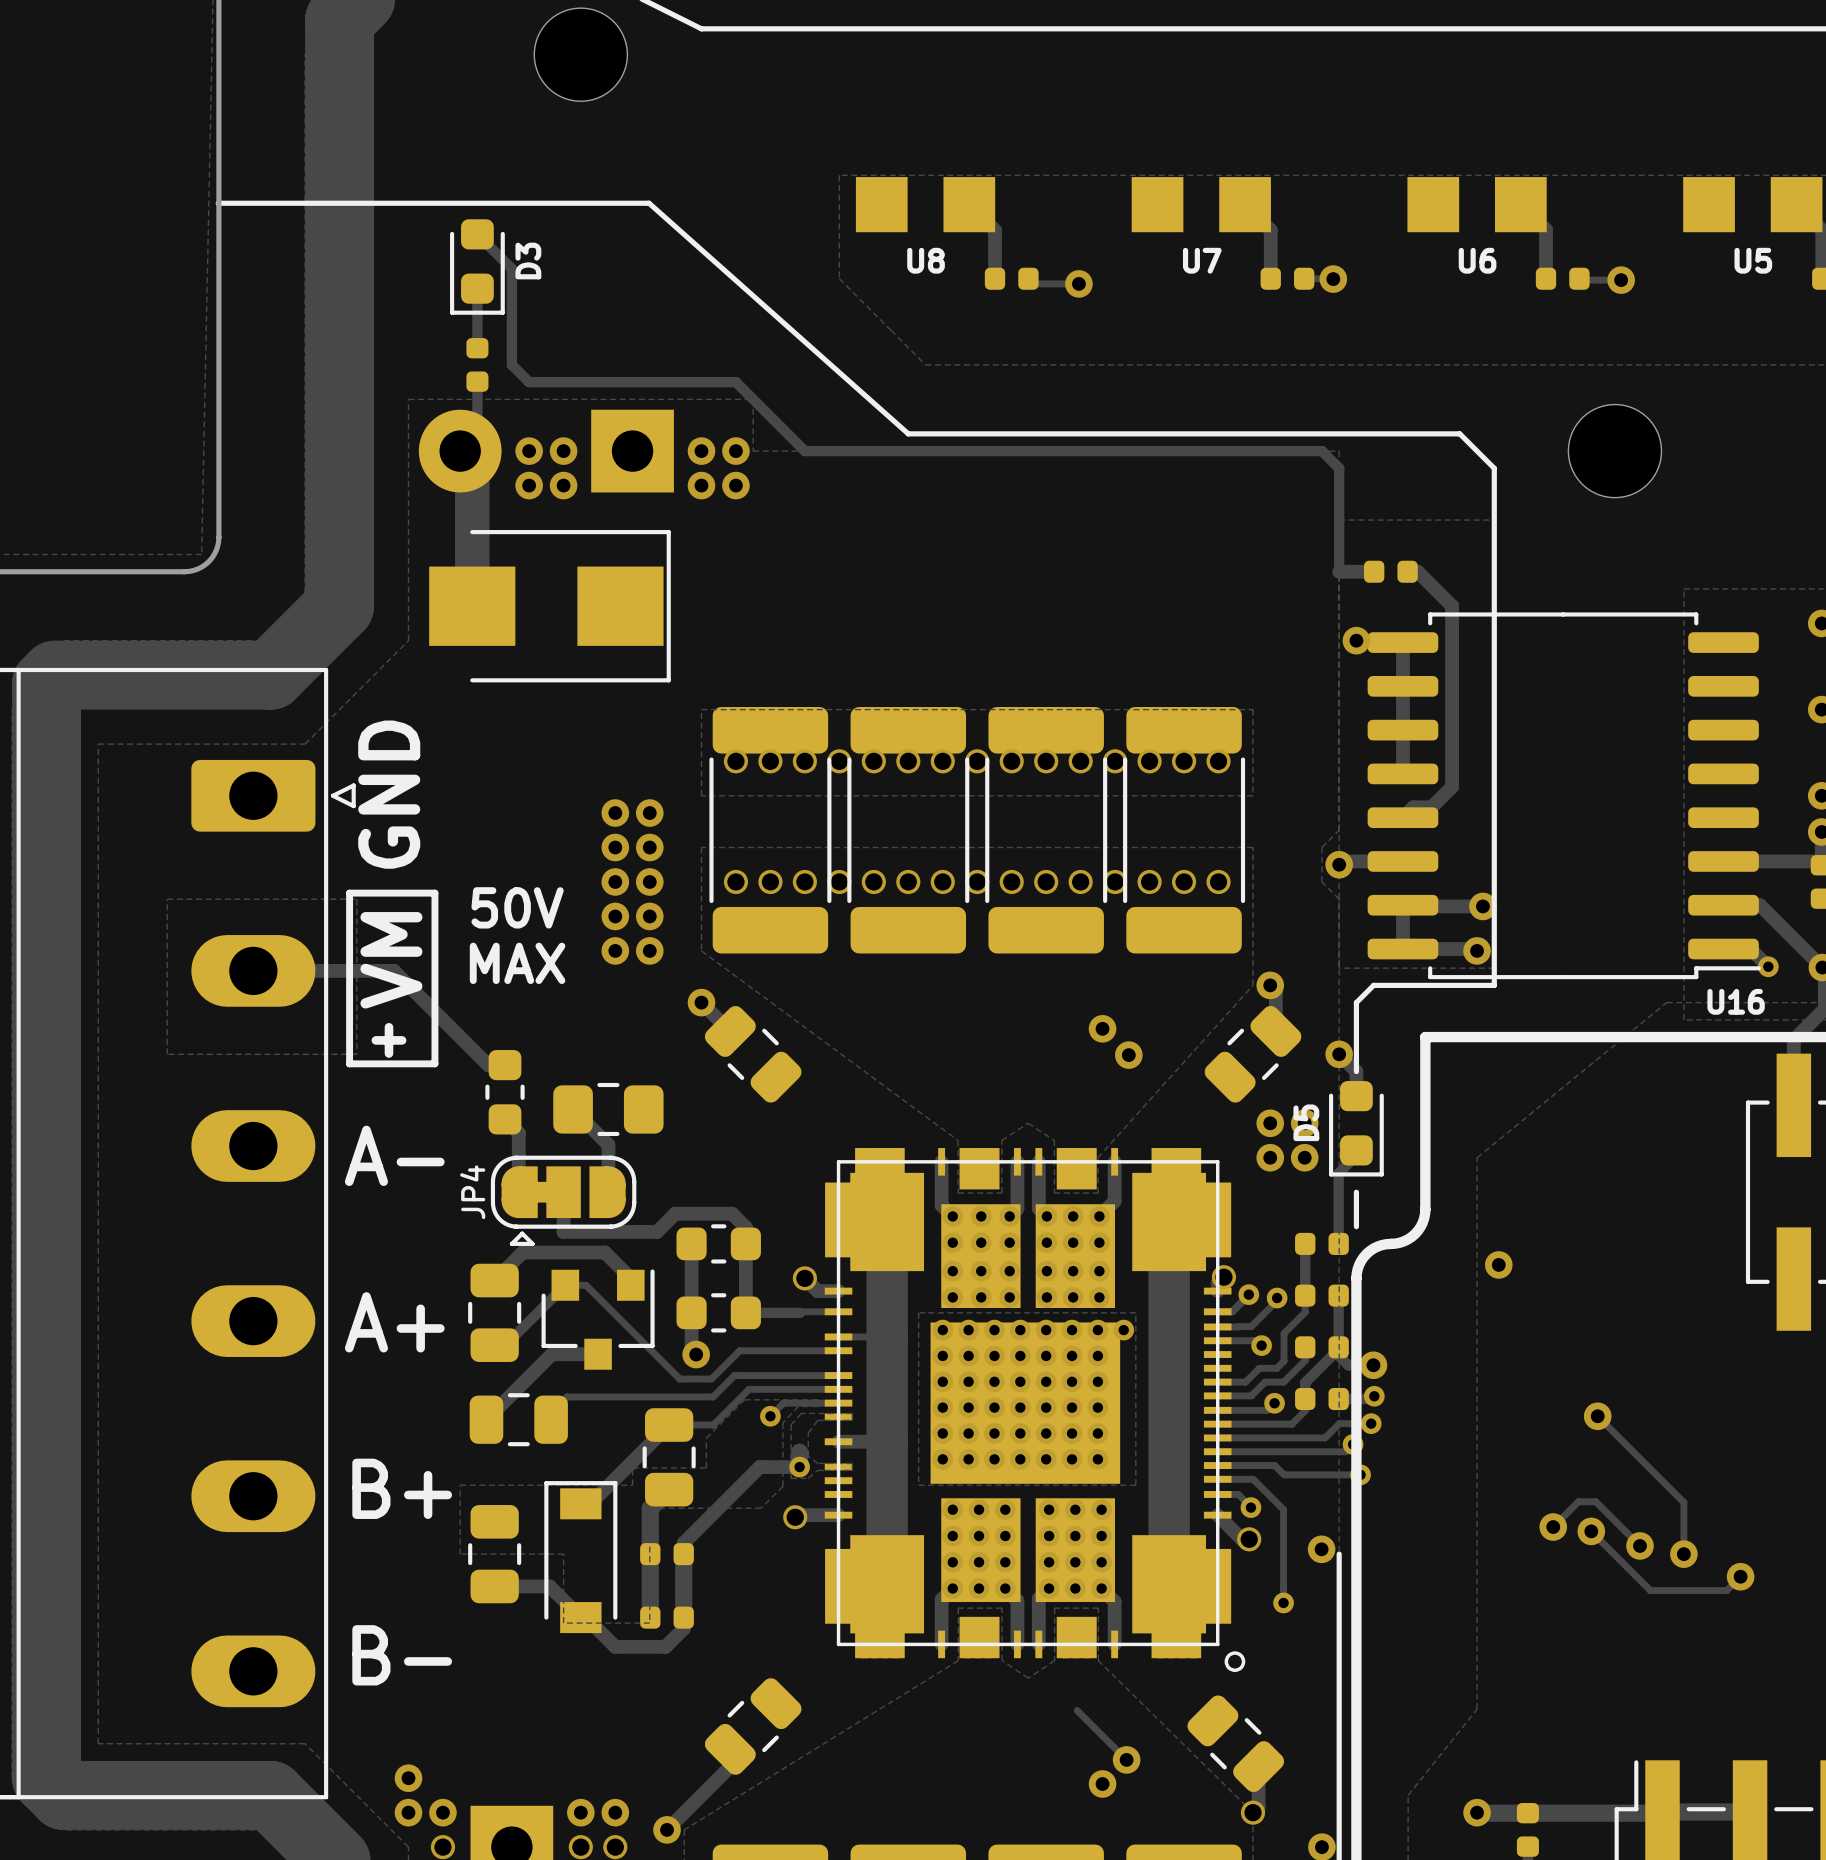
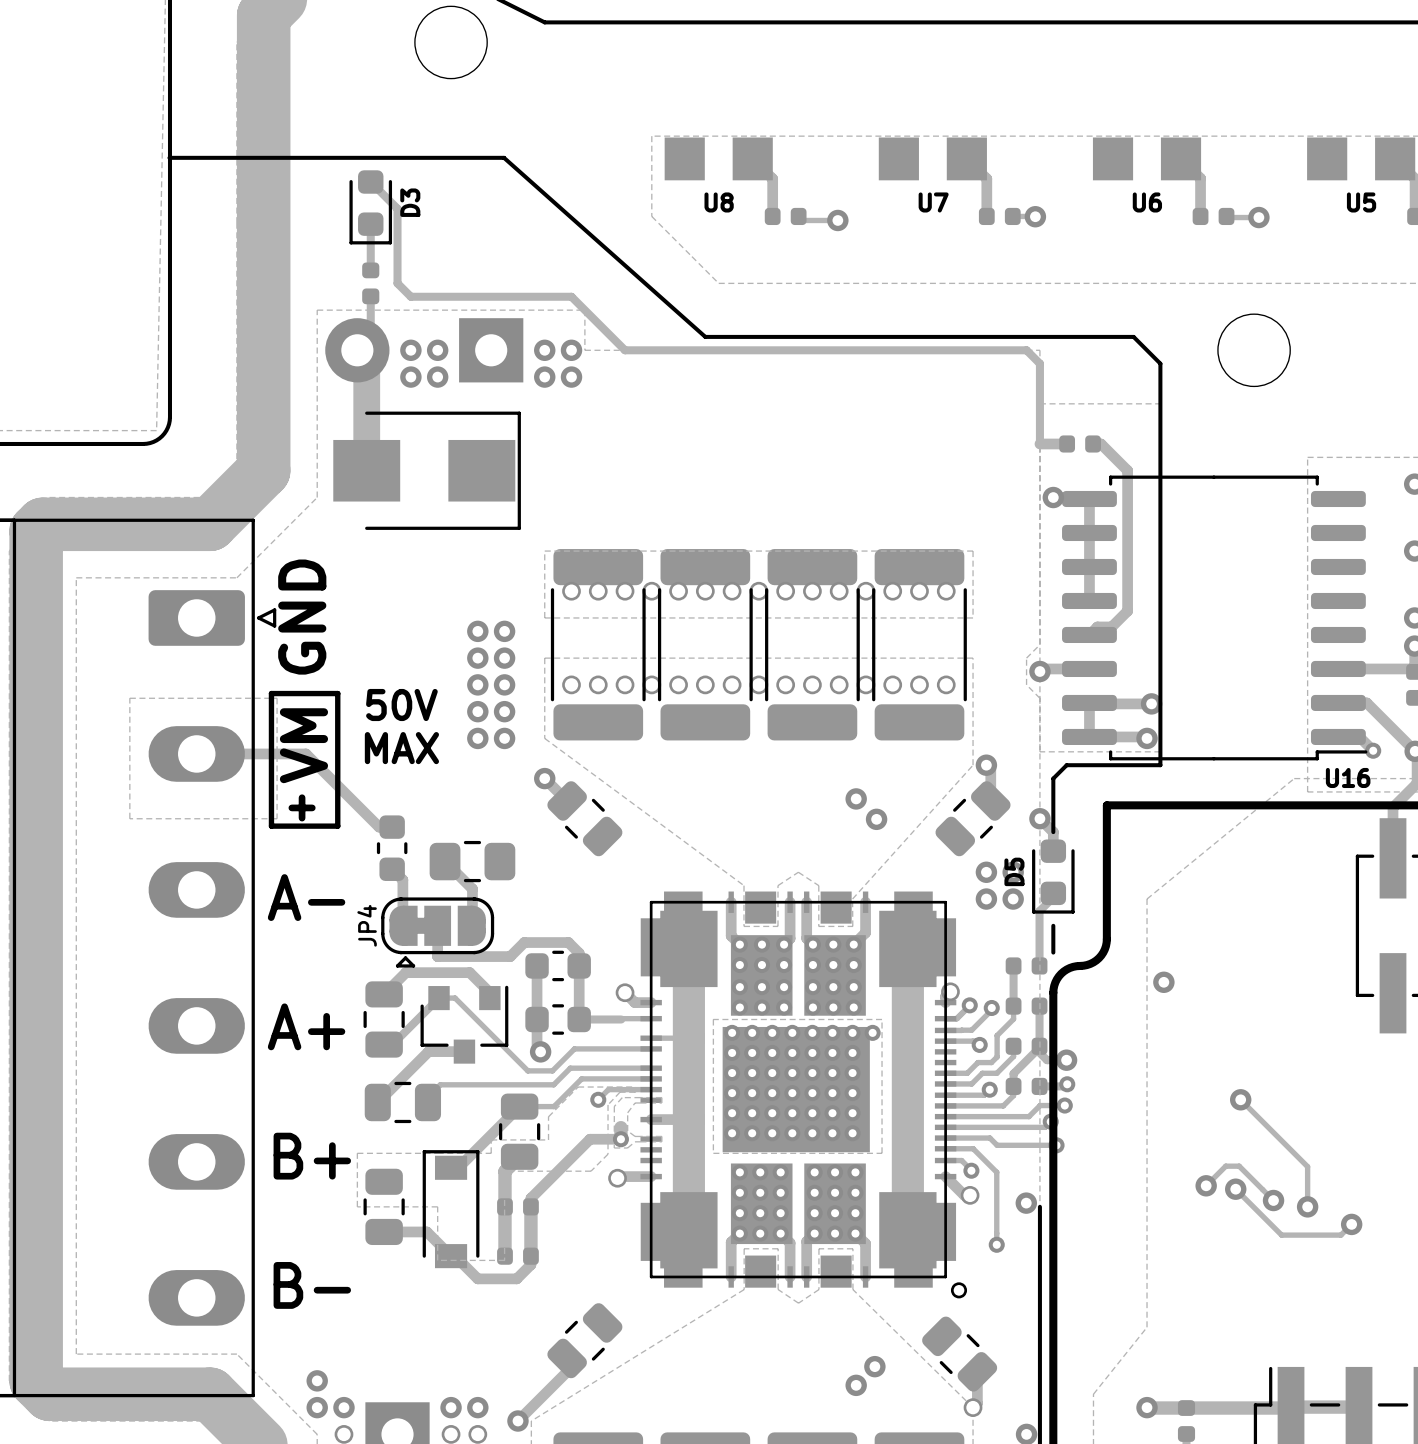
part footprint: [824, 1148, 1246, 1672] -> [640, 891, 968, 1299]
track: (1077, 1710) (1126, 1759) -> none

